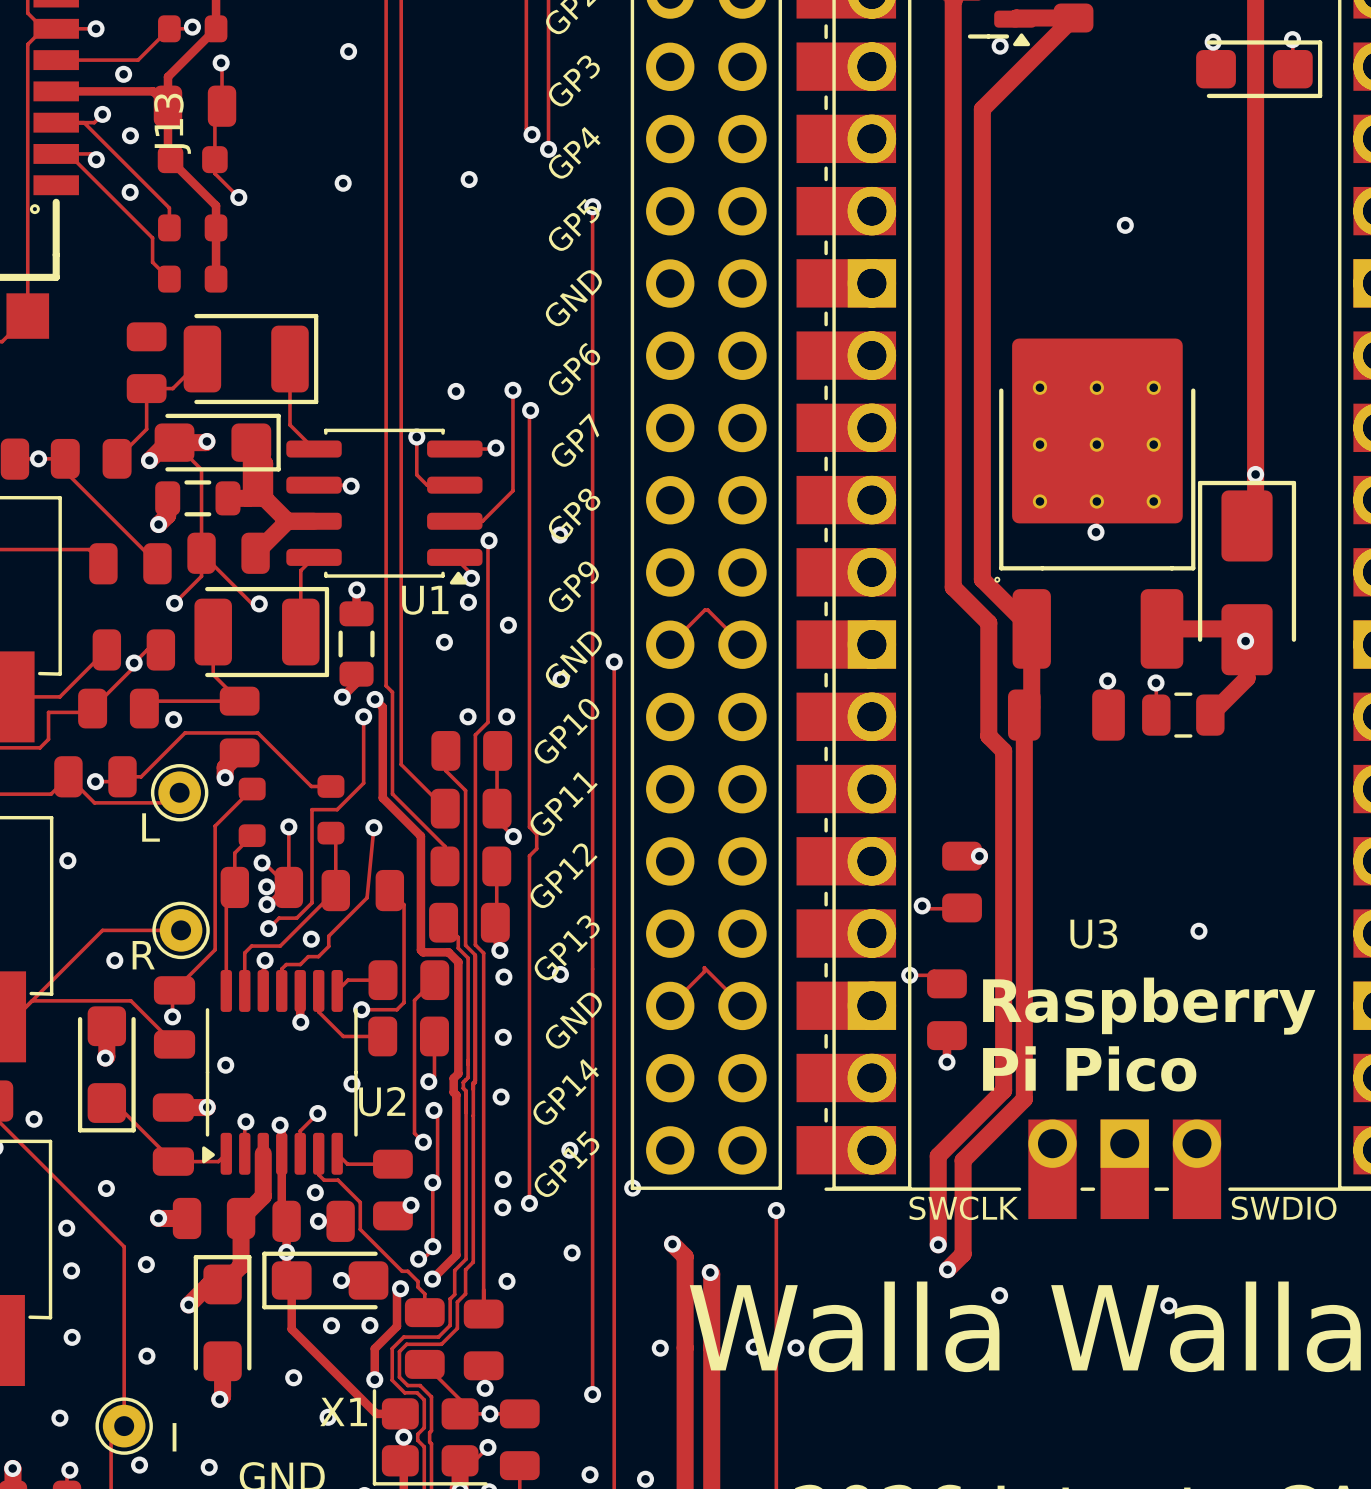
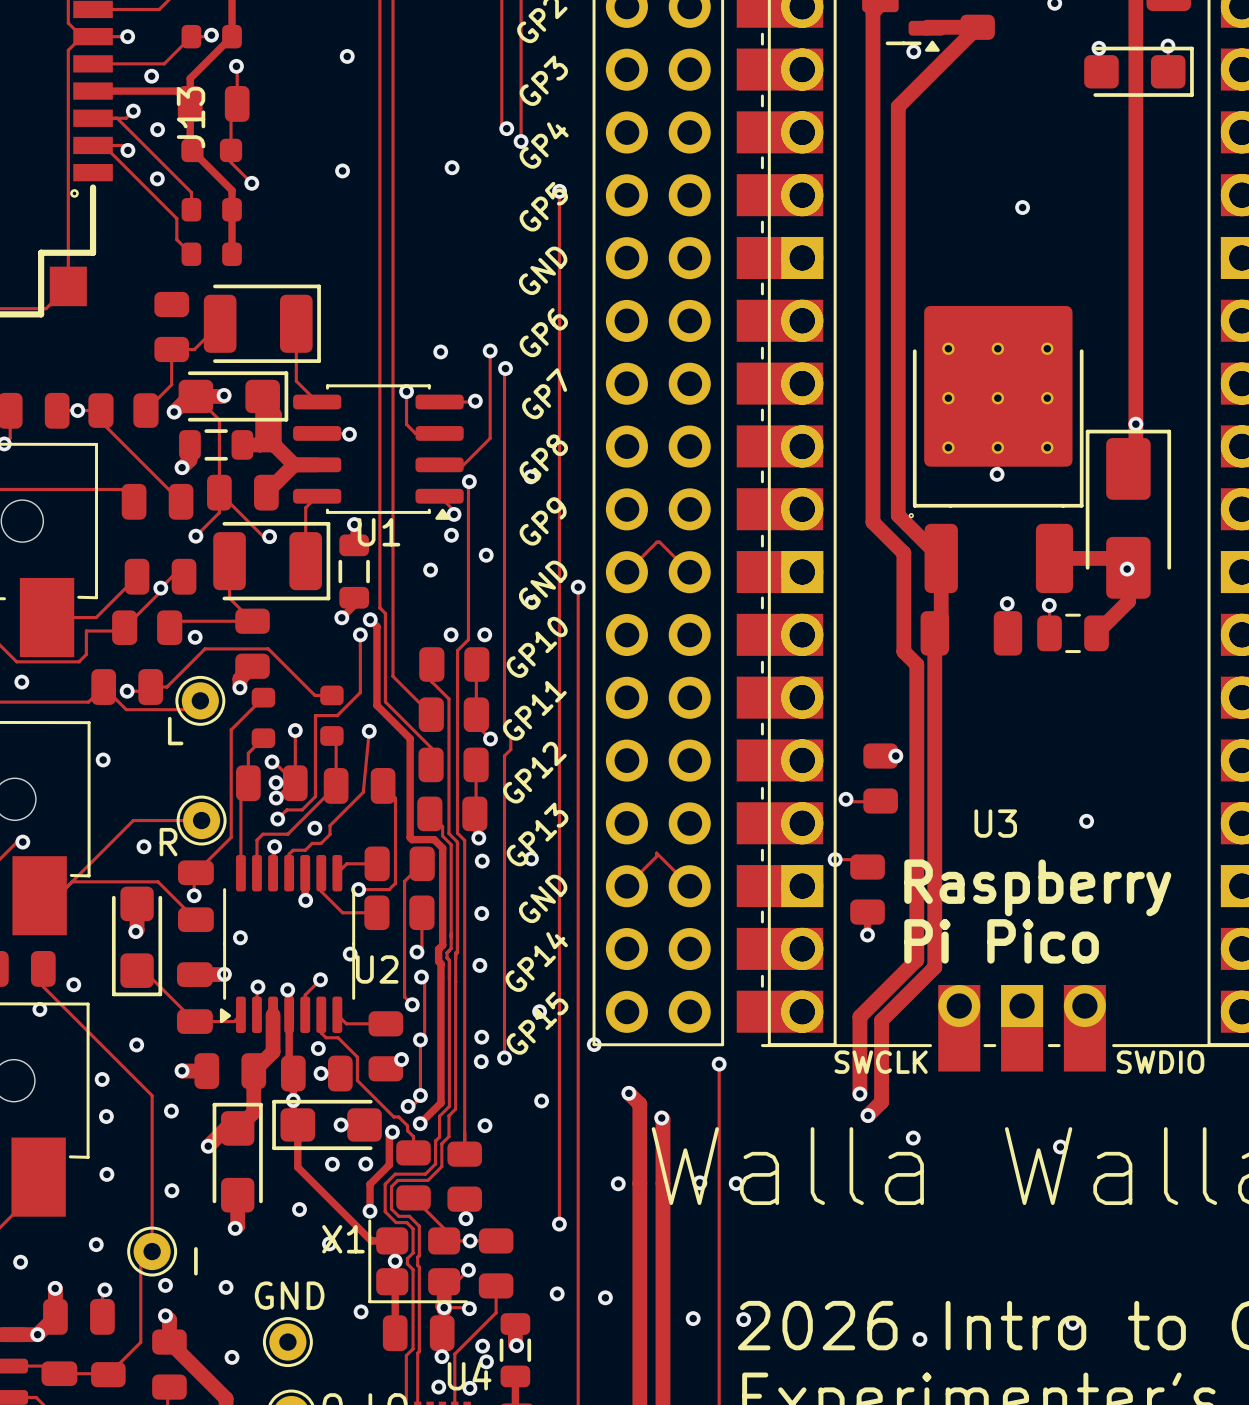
U1 name position: U1 (425, 600) -> U1 (378, 532)

